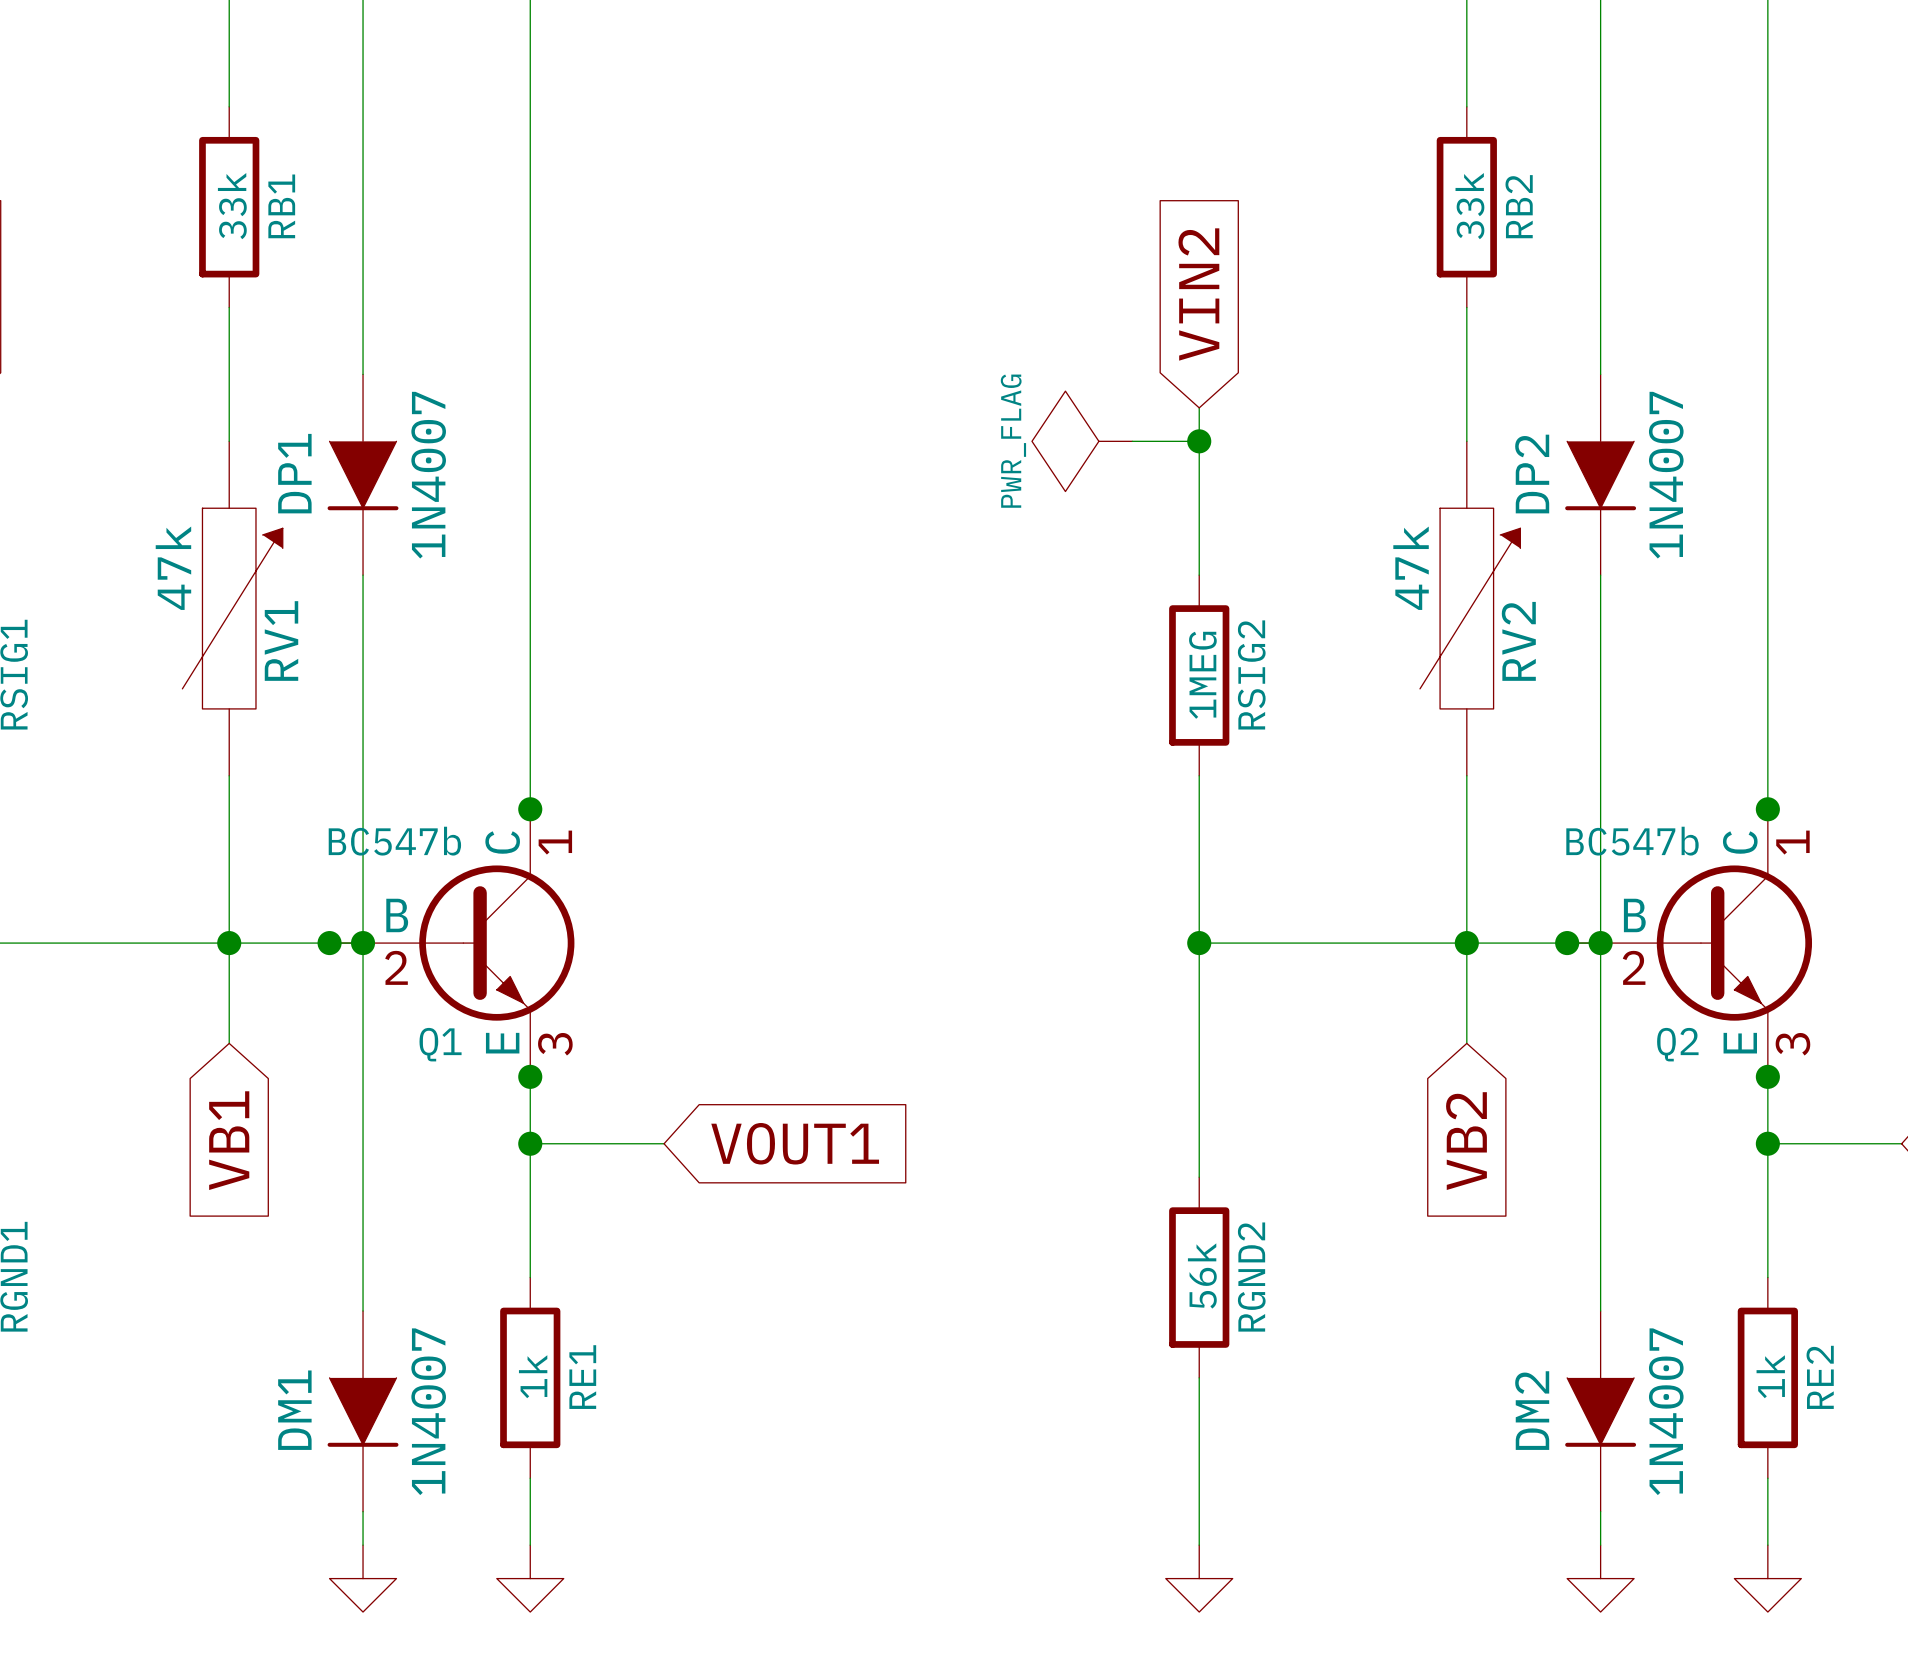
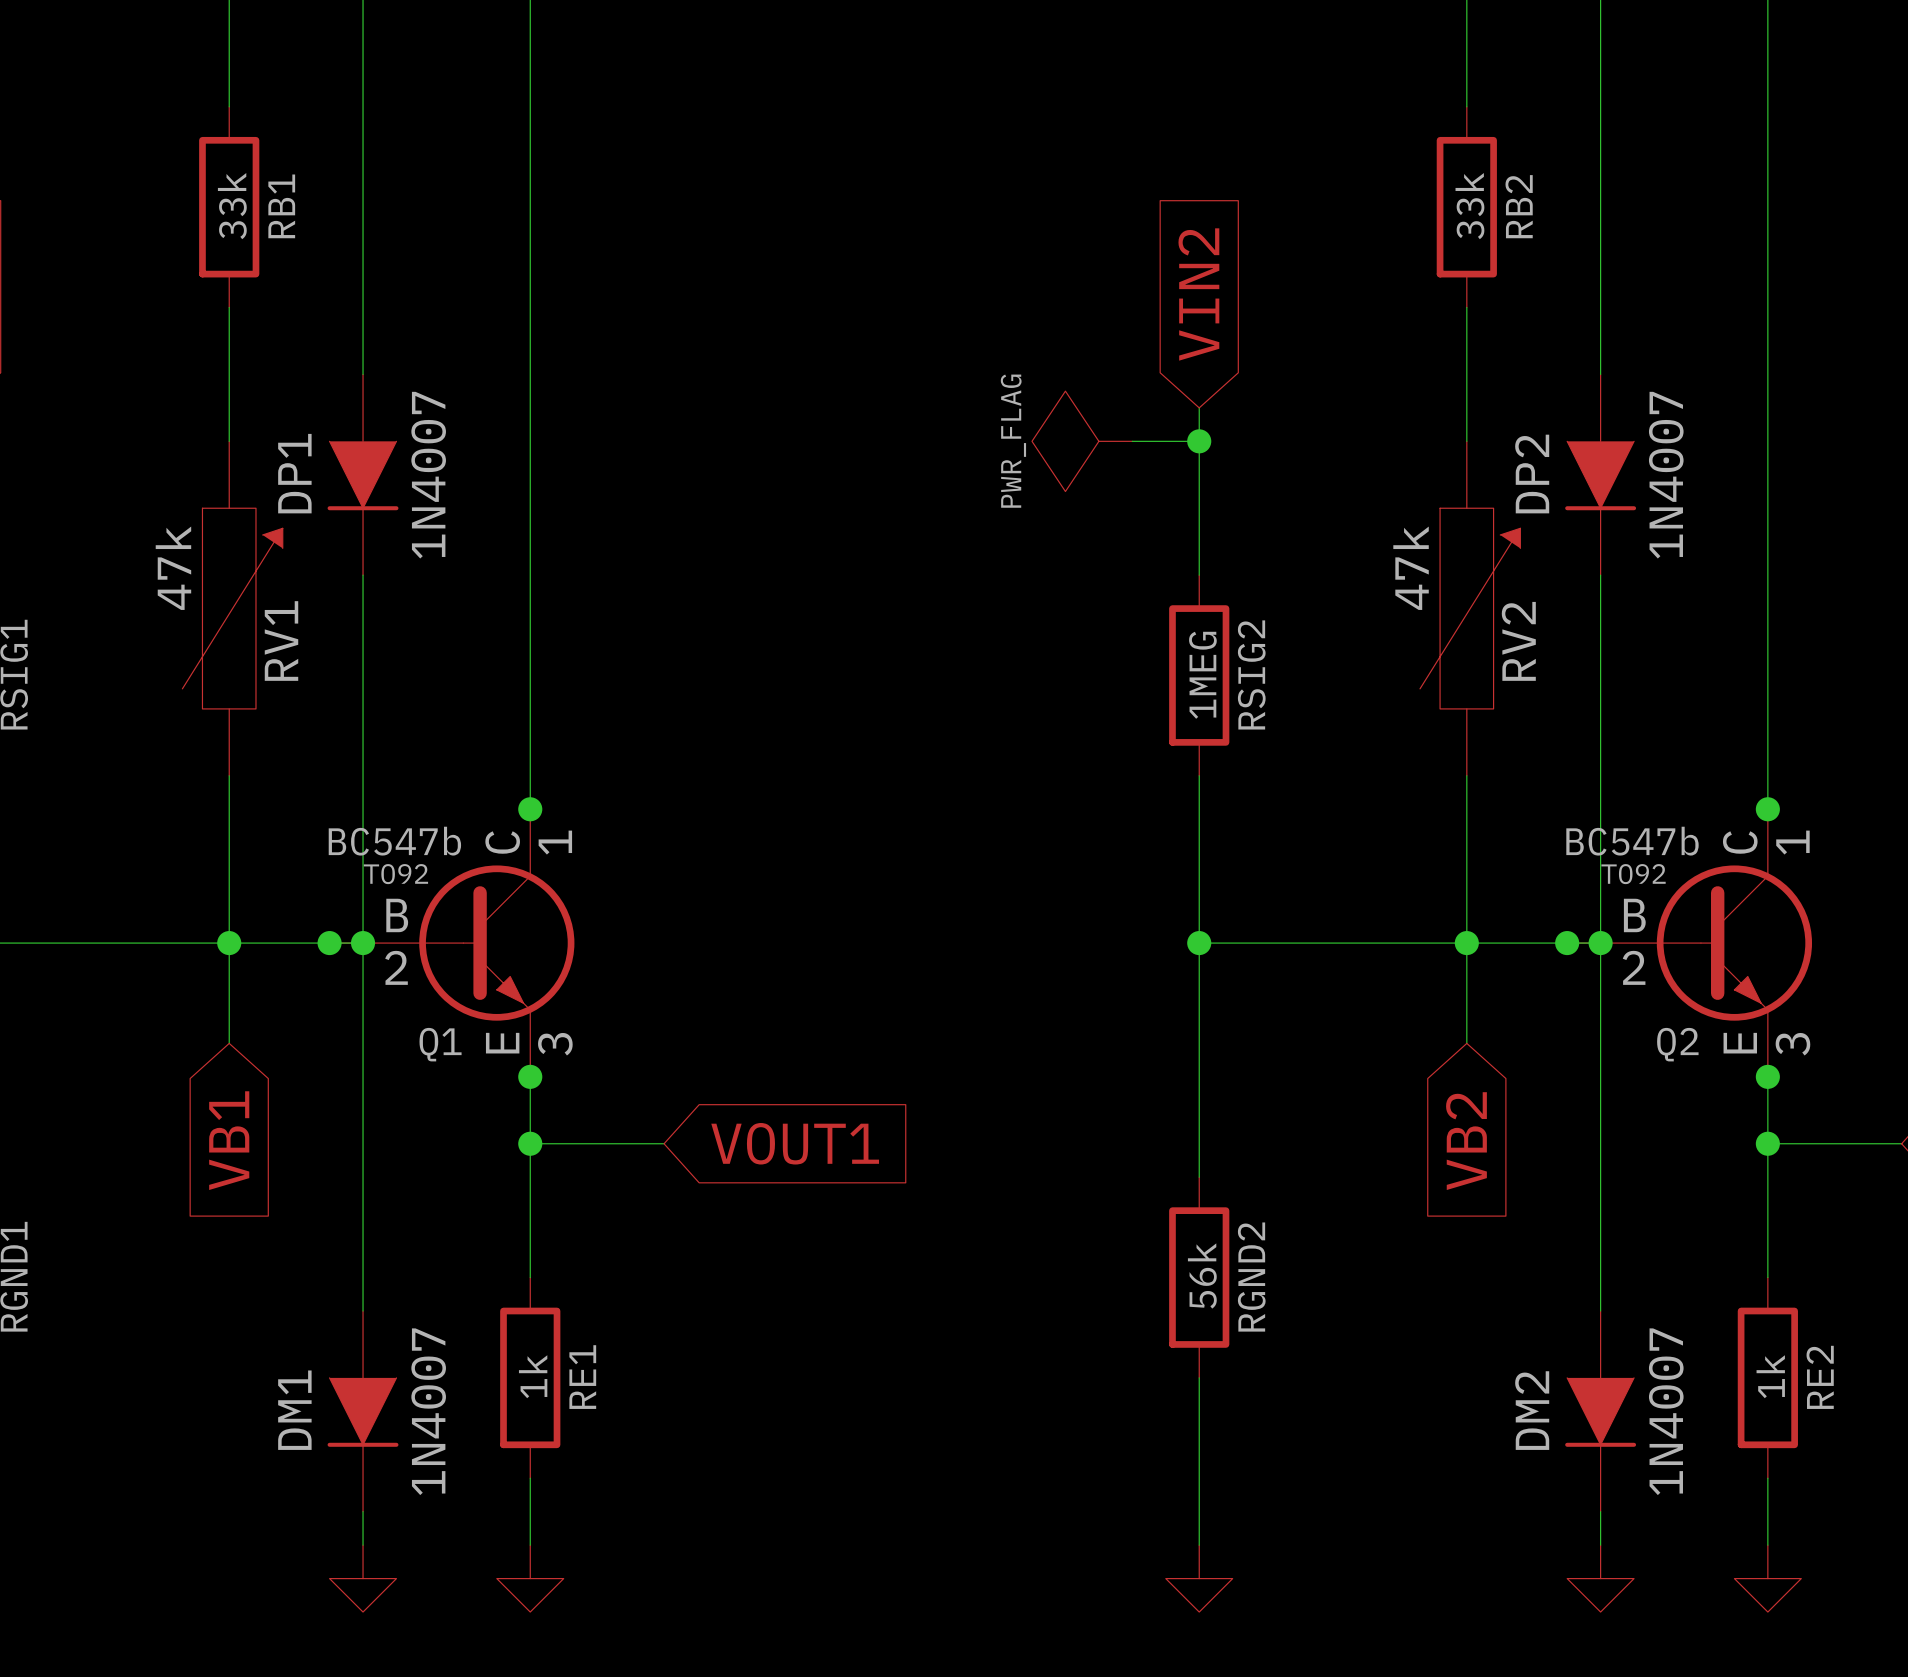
Q1 text: none -> TO92 (395, 874)
Q2 text: none -> TO92 (1633, 874)

